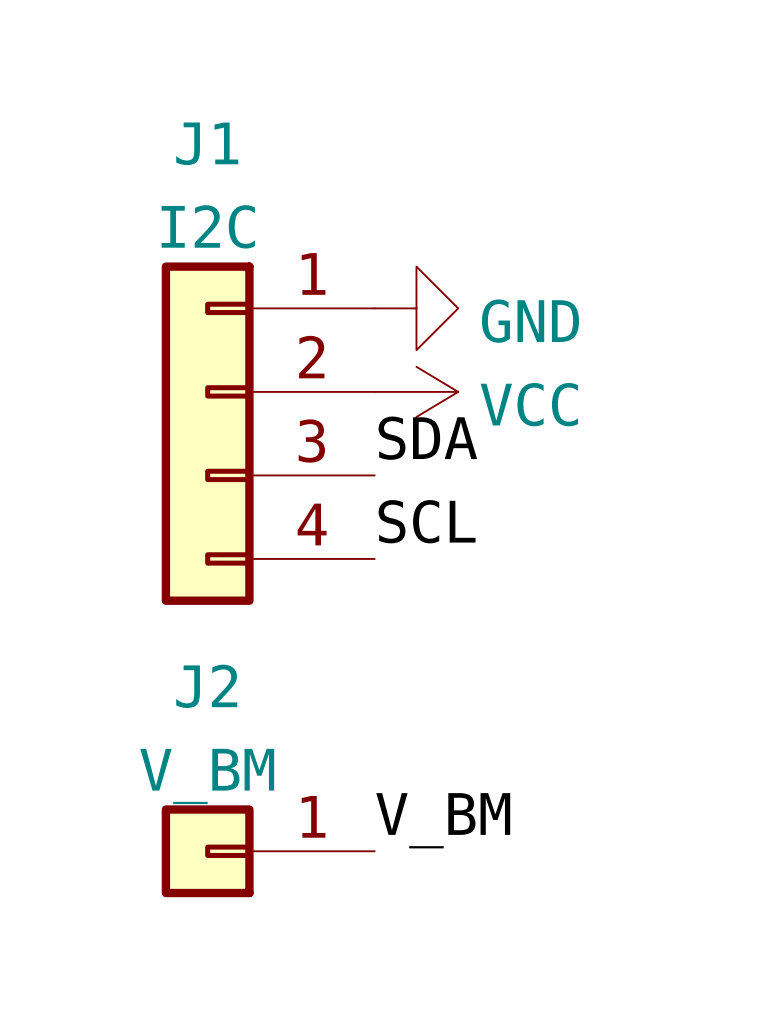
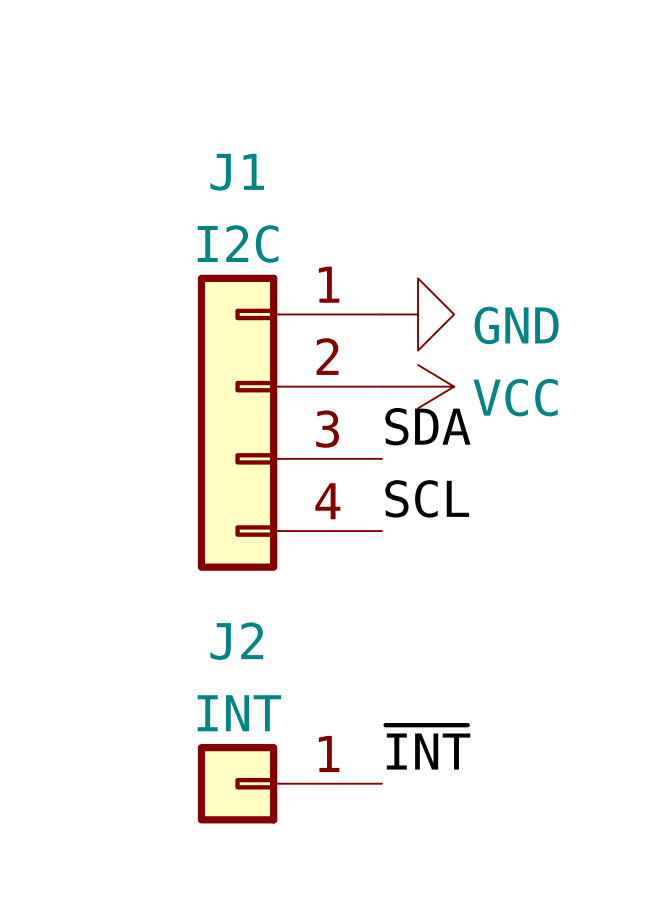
J2 value: V_BM (207, 776) -> INT (239, 713)
label: V_BM (443, 820) -> ~{INT} (427, 747)

